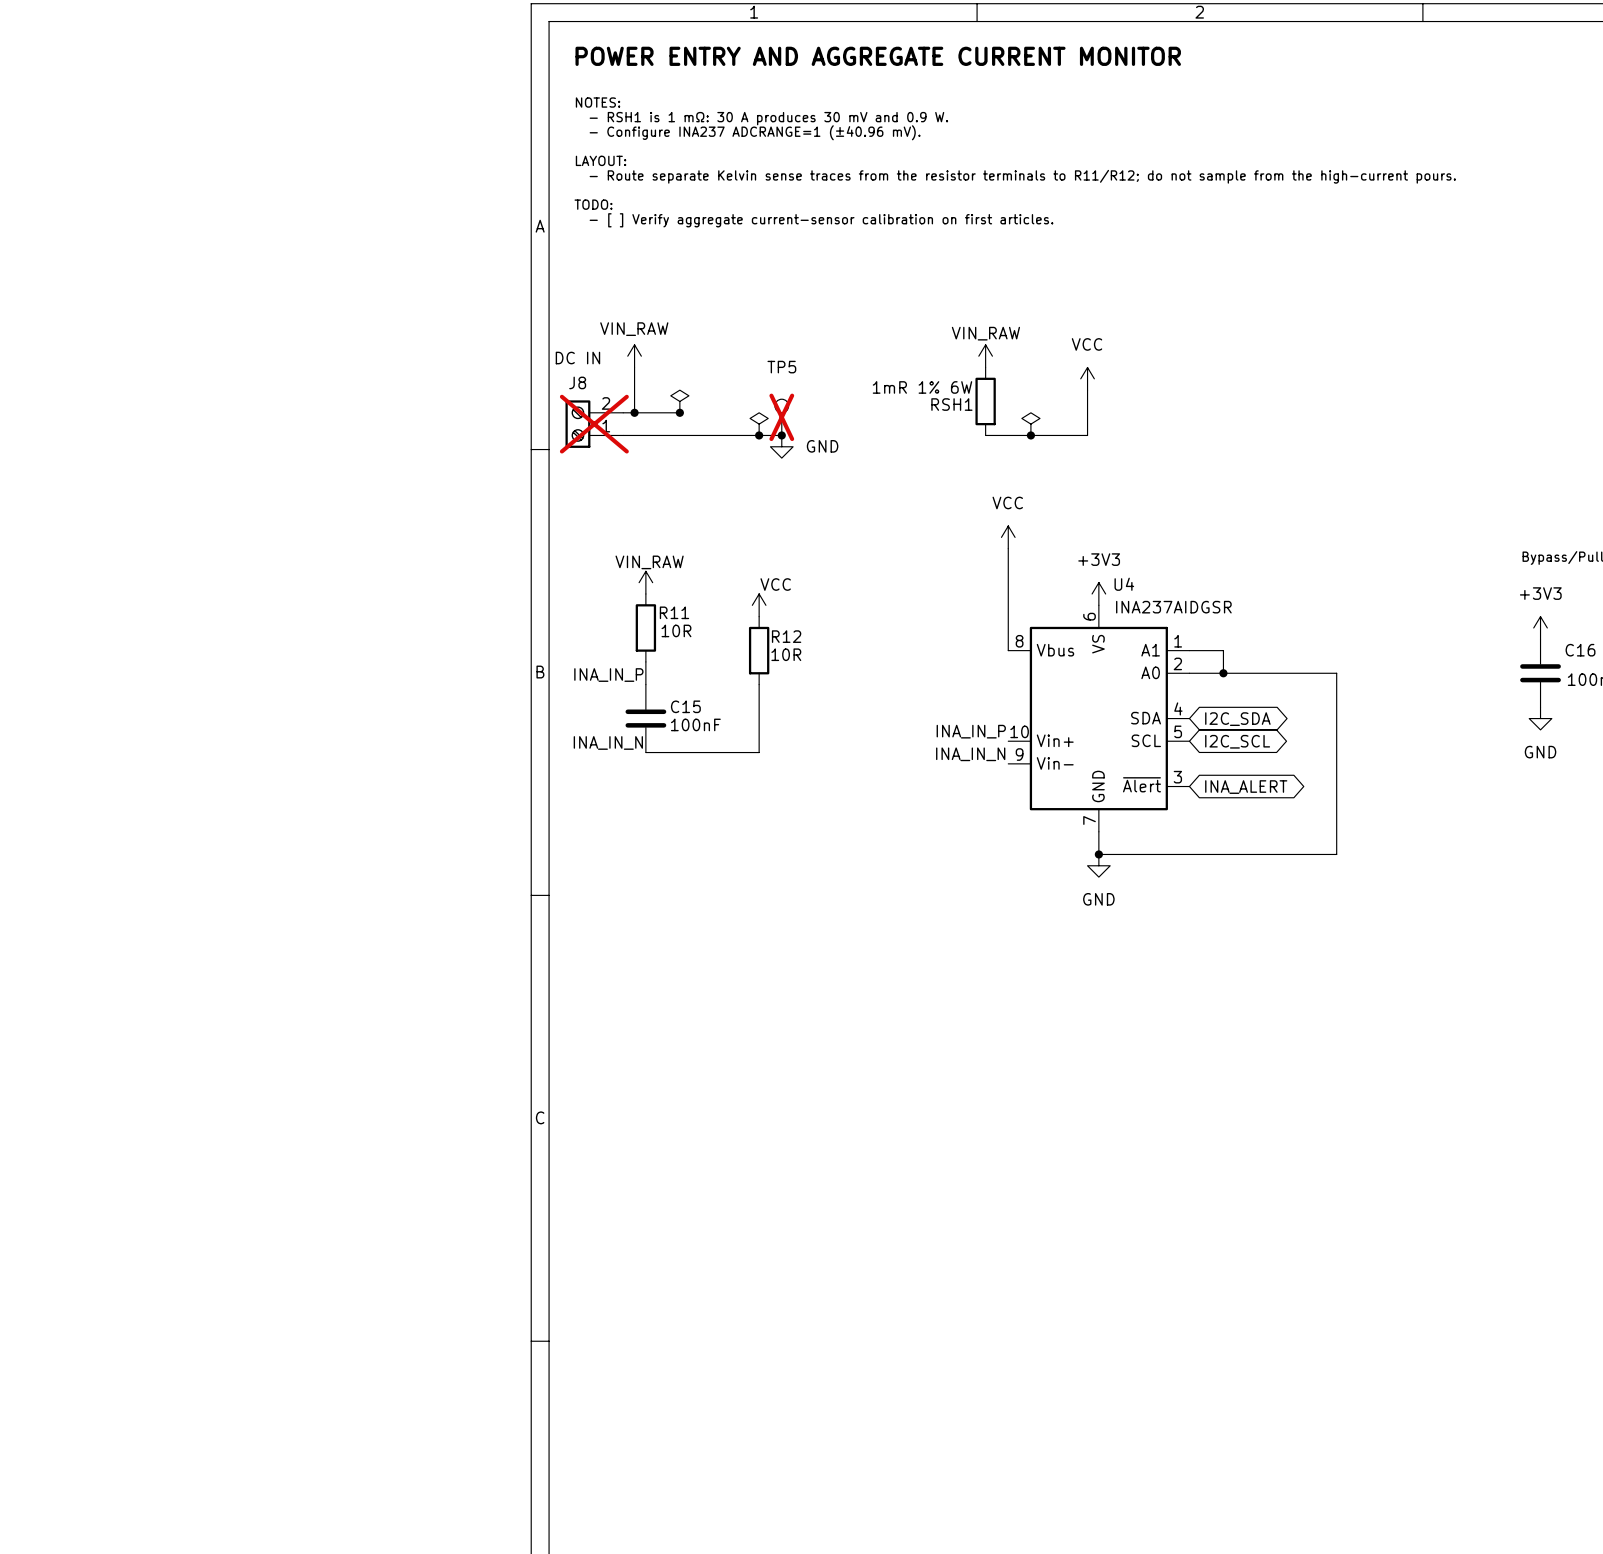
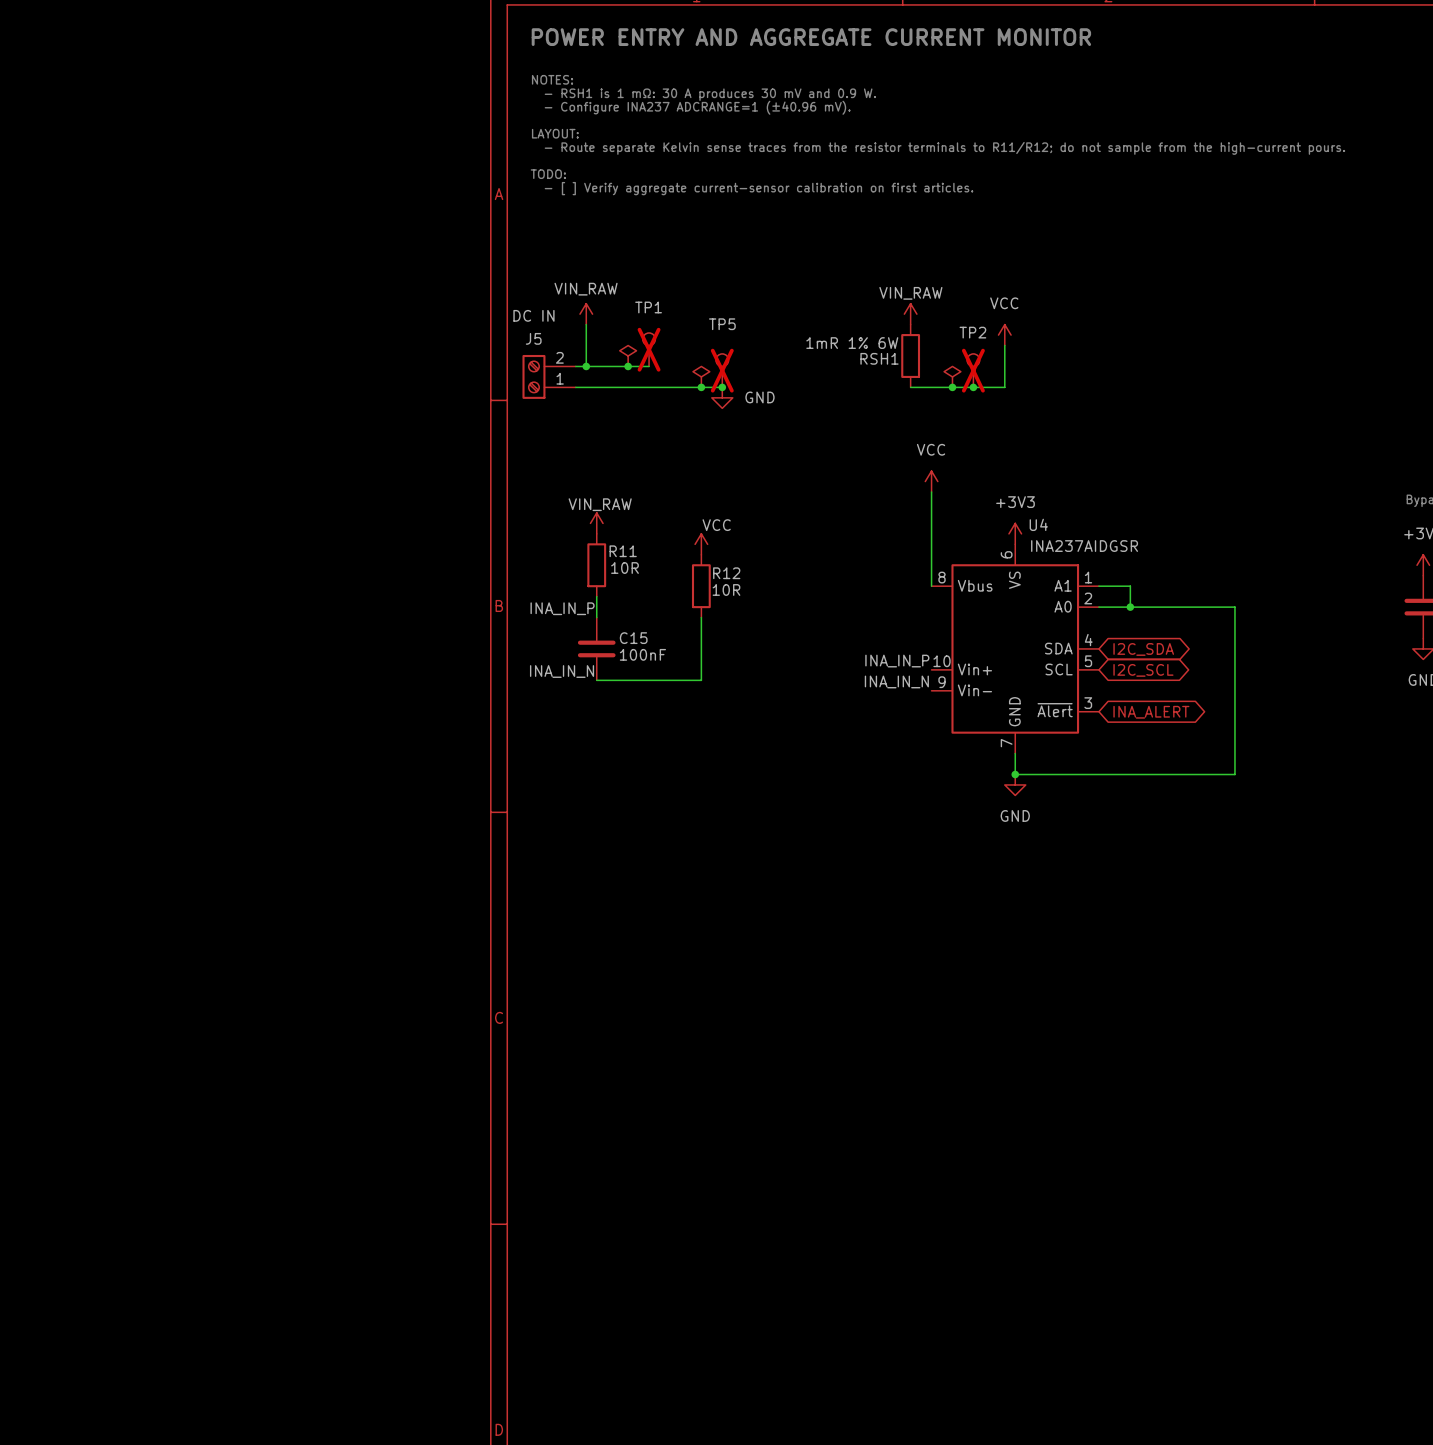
J8 name: J8 (577, 382) -> J5 (533, 338)
TP1: none -> (649, 349)
wire: none -> (628, 366) (649, 366)
TP2: none -> (973, 370)
J8 do-not-place cross: (594, 424) -> none
junction: none -> (973, 387)

